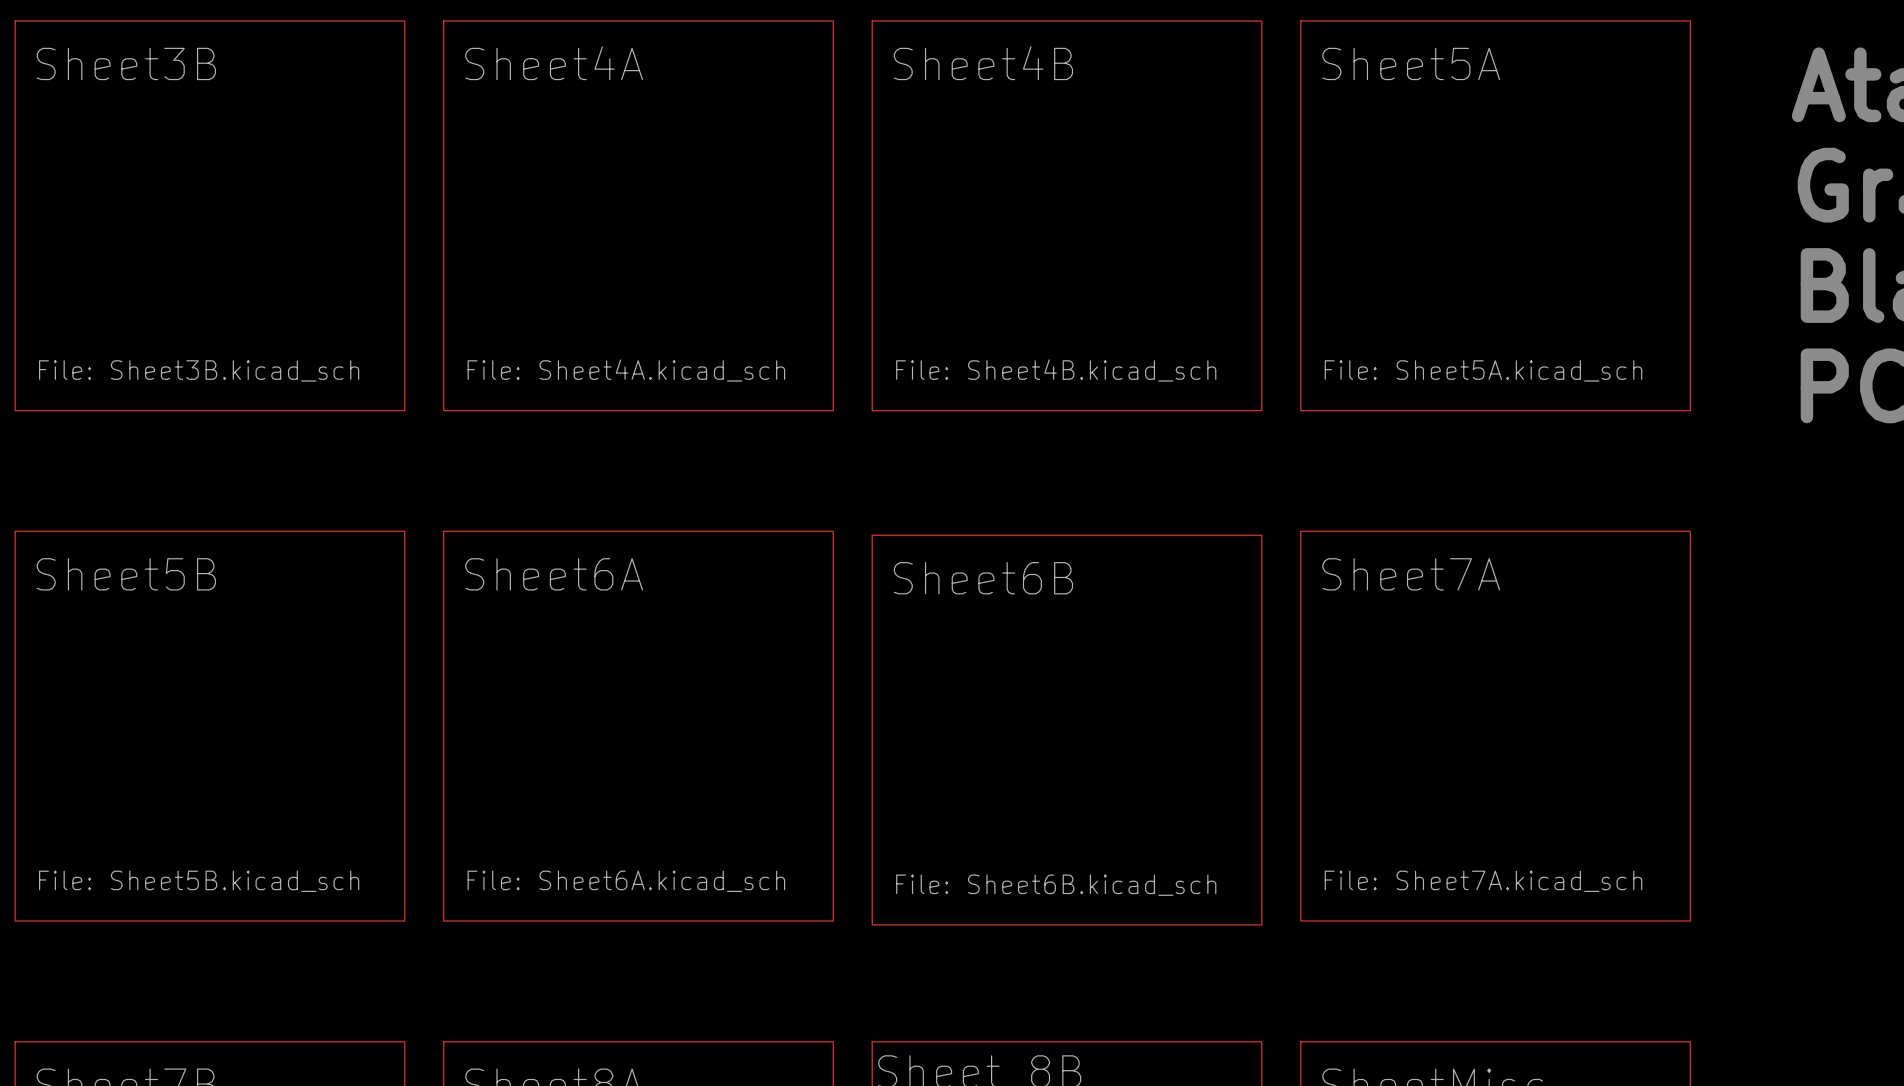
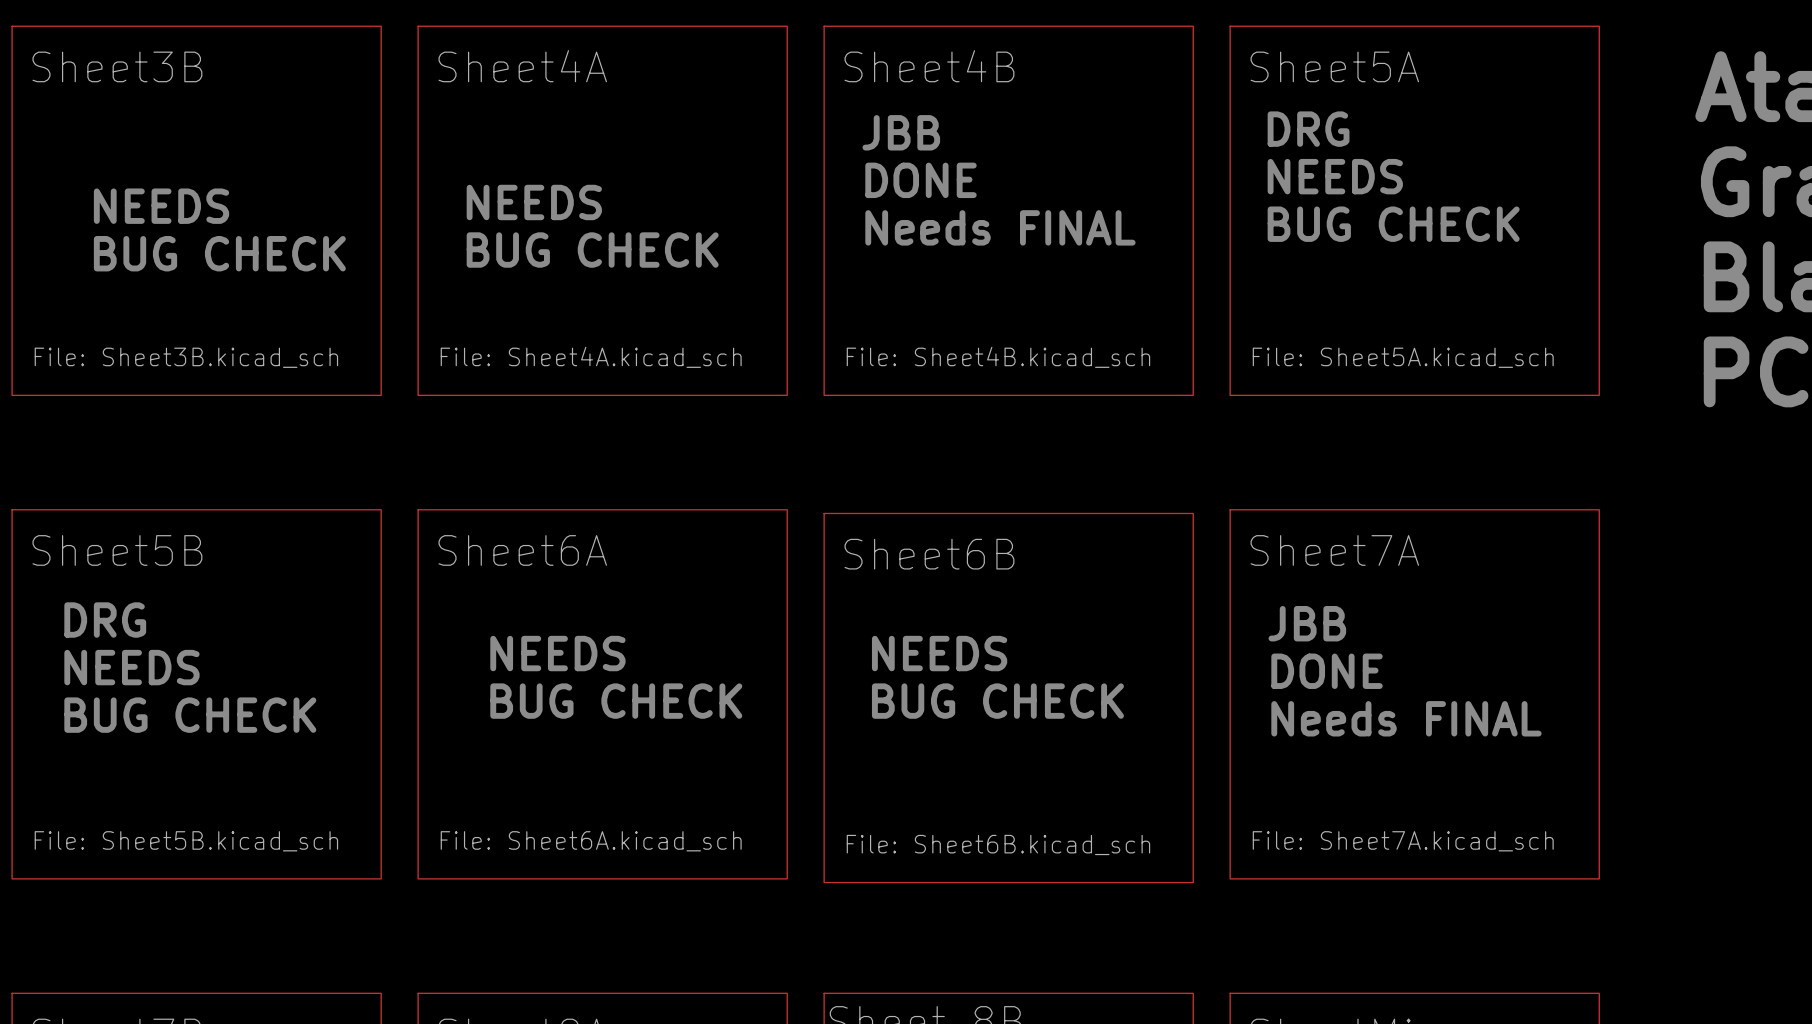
text: none -> DRG (1308, 129)
text: none -> JBB (901, 132)
text: none -> NEEDS (1335, 176)
text: none -> DONE (920, 180)
text: none -> NEEDS (534, 202)
text: none -> NEEDS (161, 206)
text: none -> BUG CHECK (1393, 224)
text: none -> Needs FINAL (1000, 227)
text: none -> BUG CHECK (592, 250)
text: none -> BUG CHECK (219, 253)
text: none -> DRG (105, 620)
text: none -> JBB (1307, 623)
text: none -> NEEDS (557, 653)
text: none -> NEEDS (939, 653)
text: none -> NEEDS (131, 667)
text: none -> DONE (1327, 671)
text: none -> BUG CHECK (616, 701)
text: none -> BUG CHECK (997, 701)
text: none -> BUG CHECK (190, 715)
text: none -> Needs FINAL (1406, 718)

